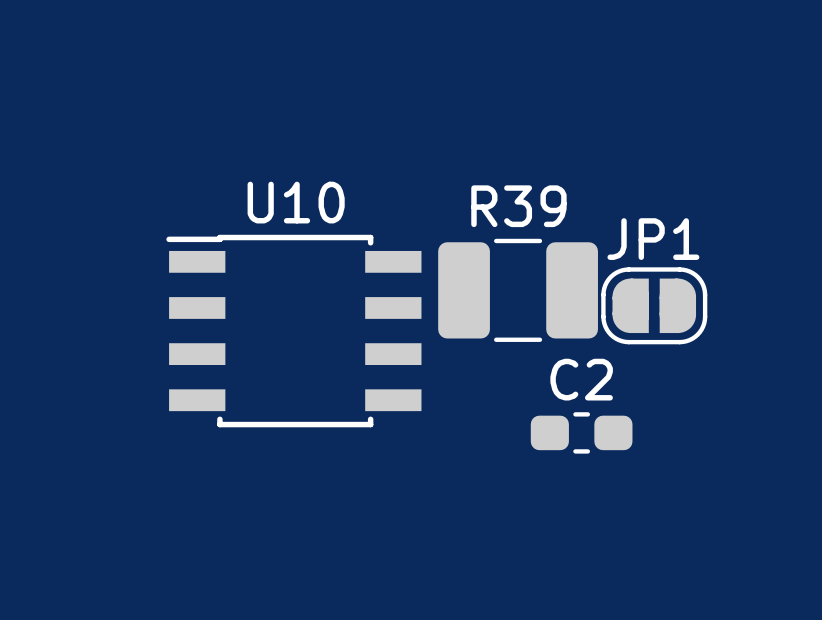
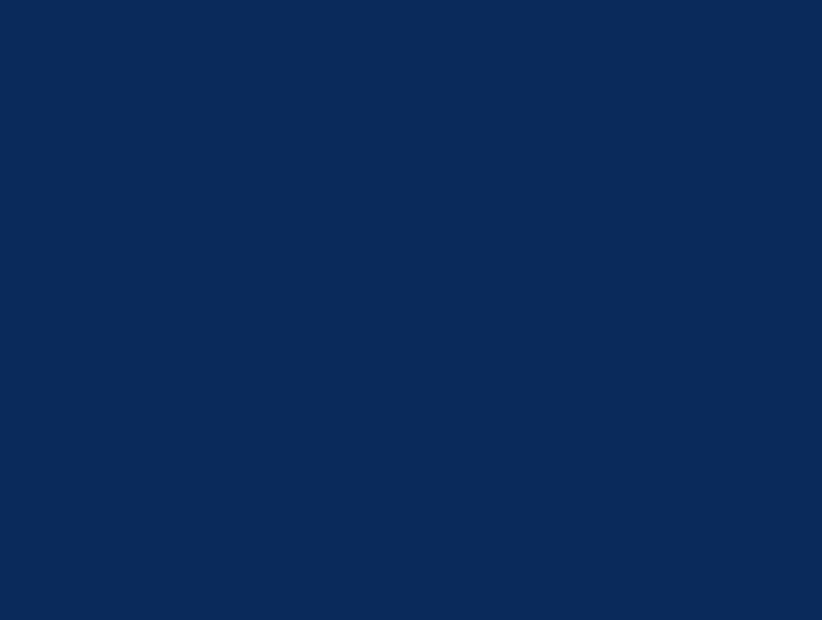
R39: (518, 290) -> none
JP1: (654, 305) -> none
U10: (293, 331) -> none
C2: (581, 432) -> none

